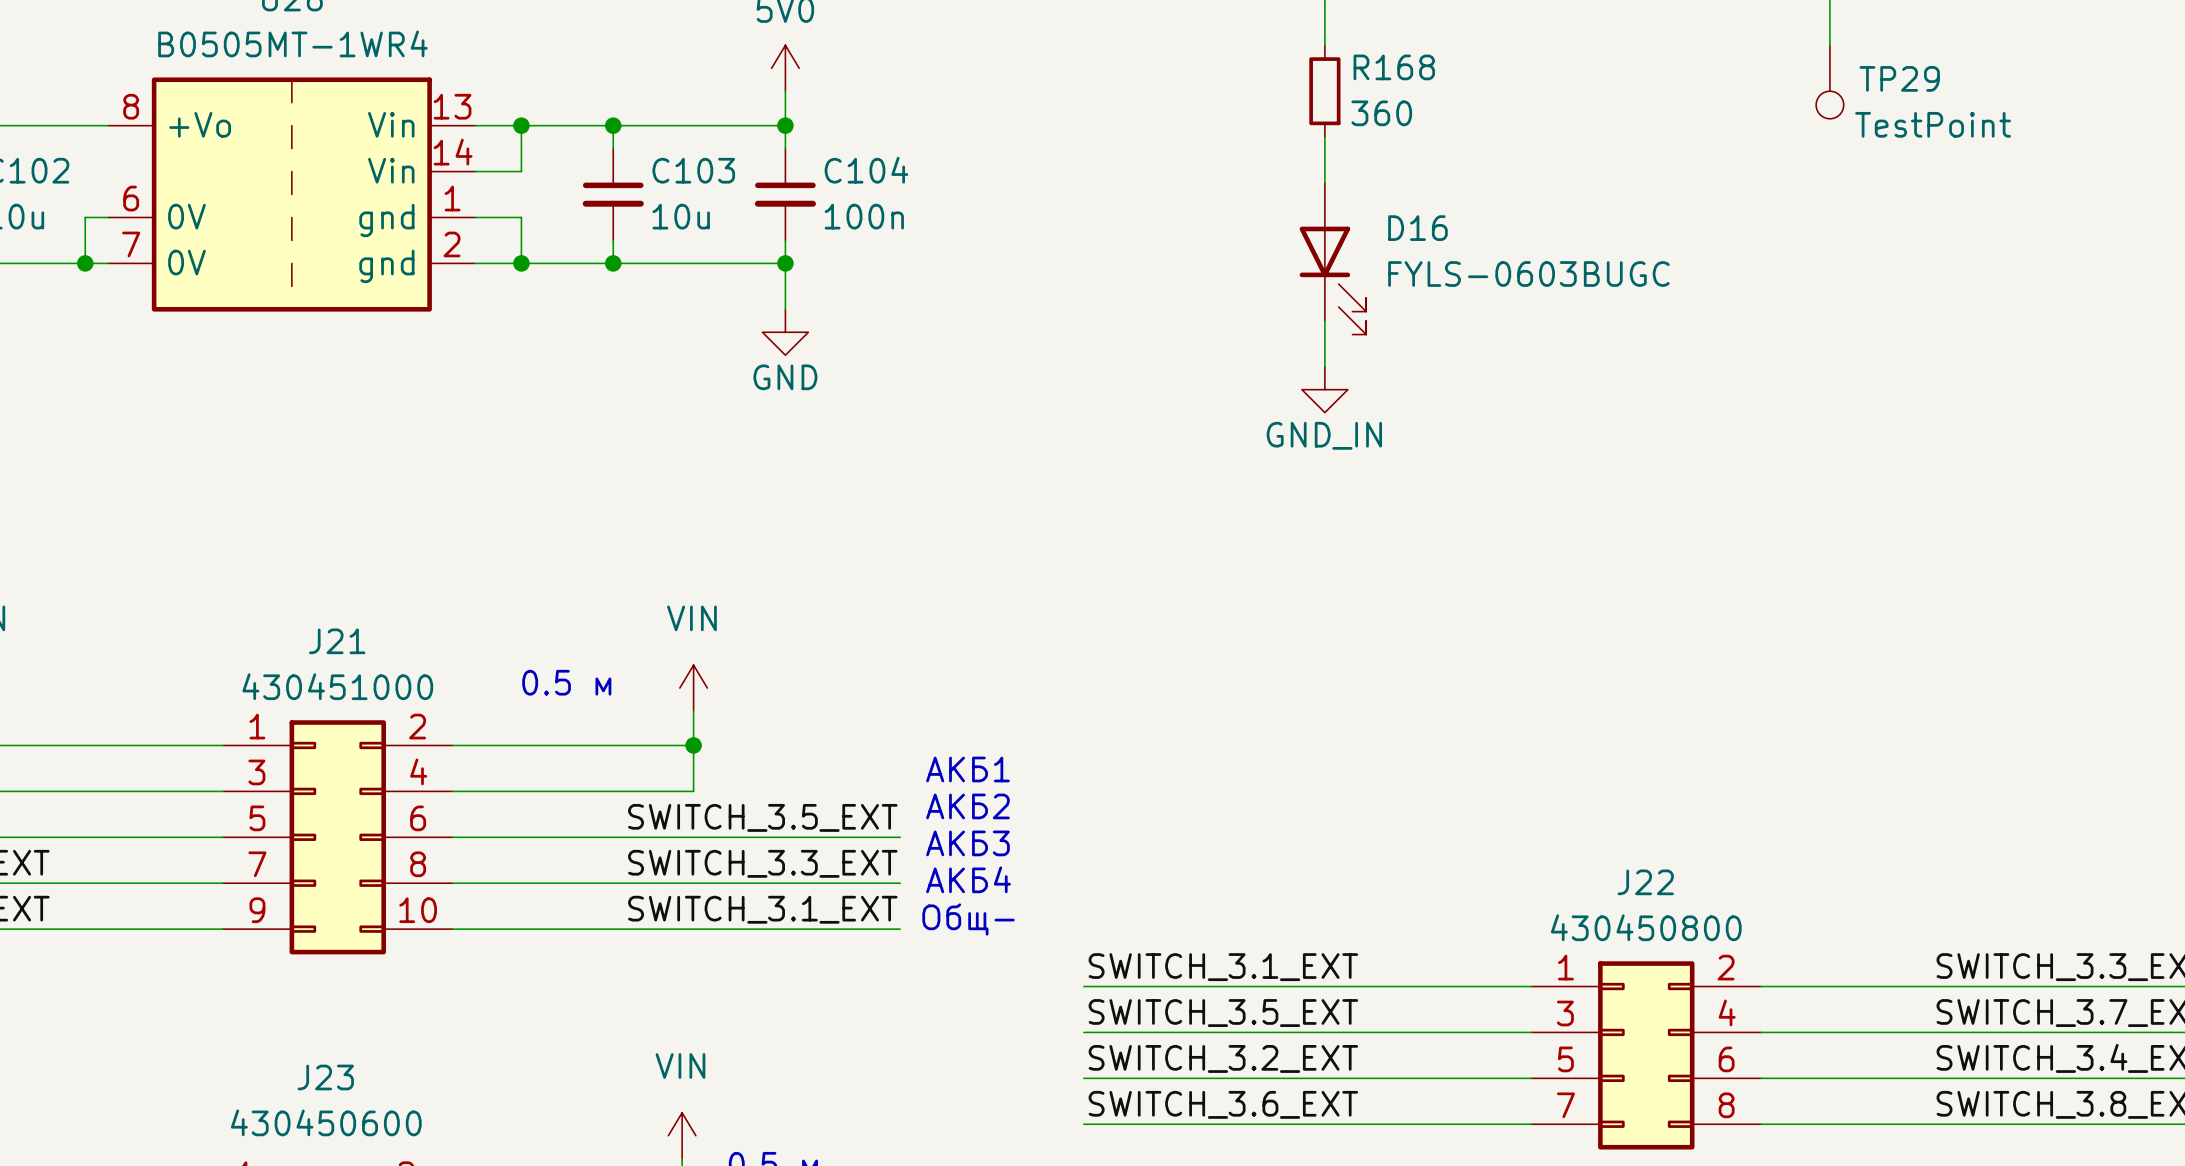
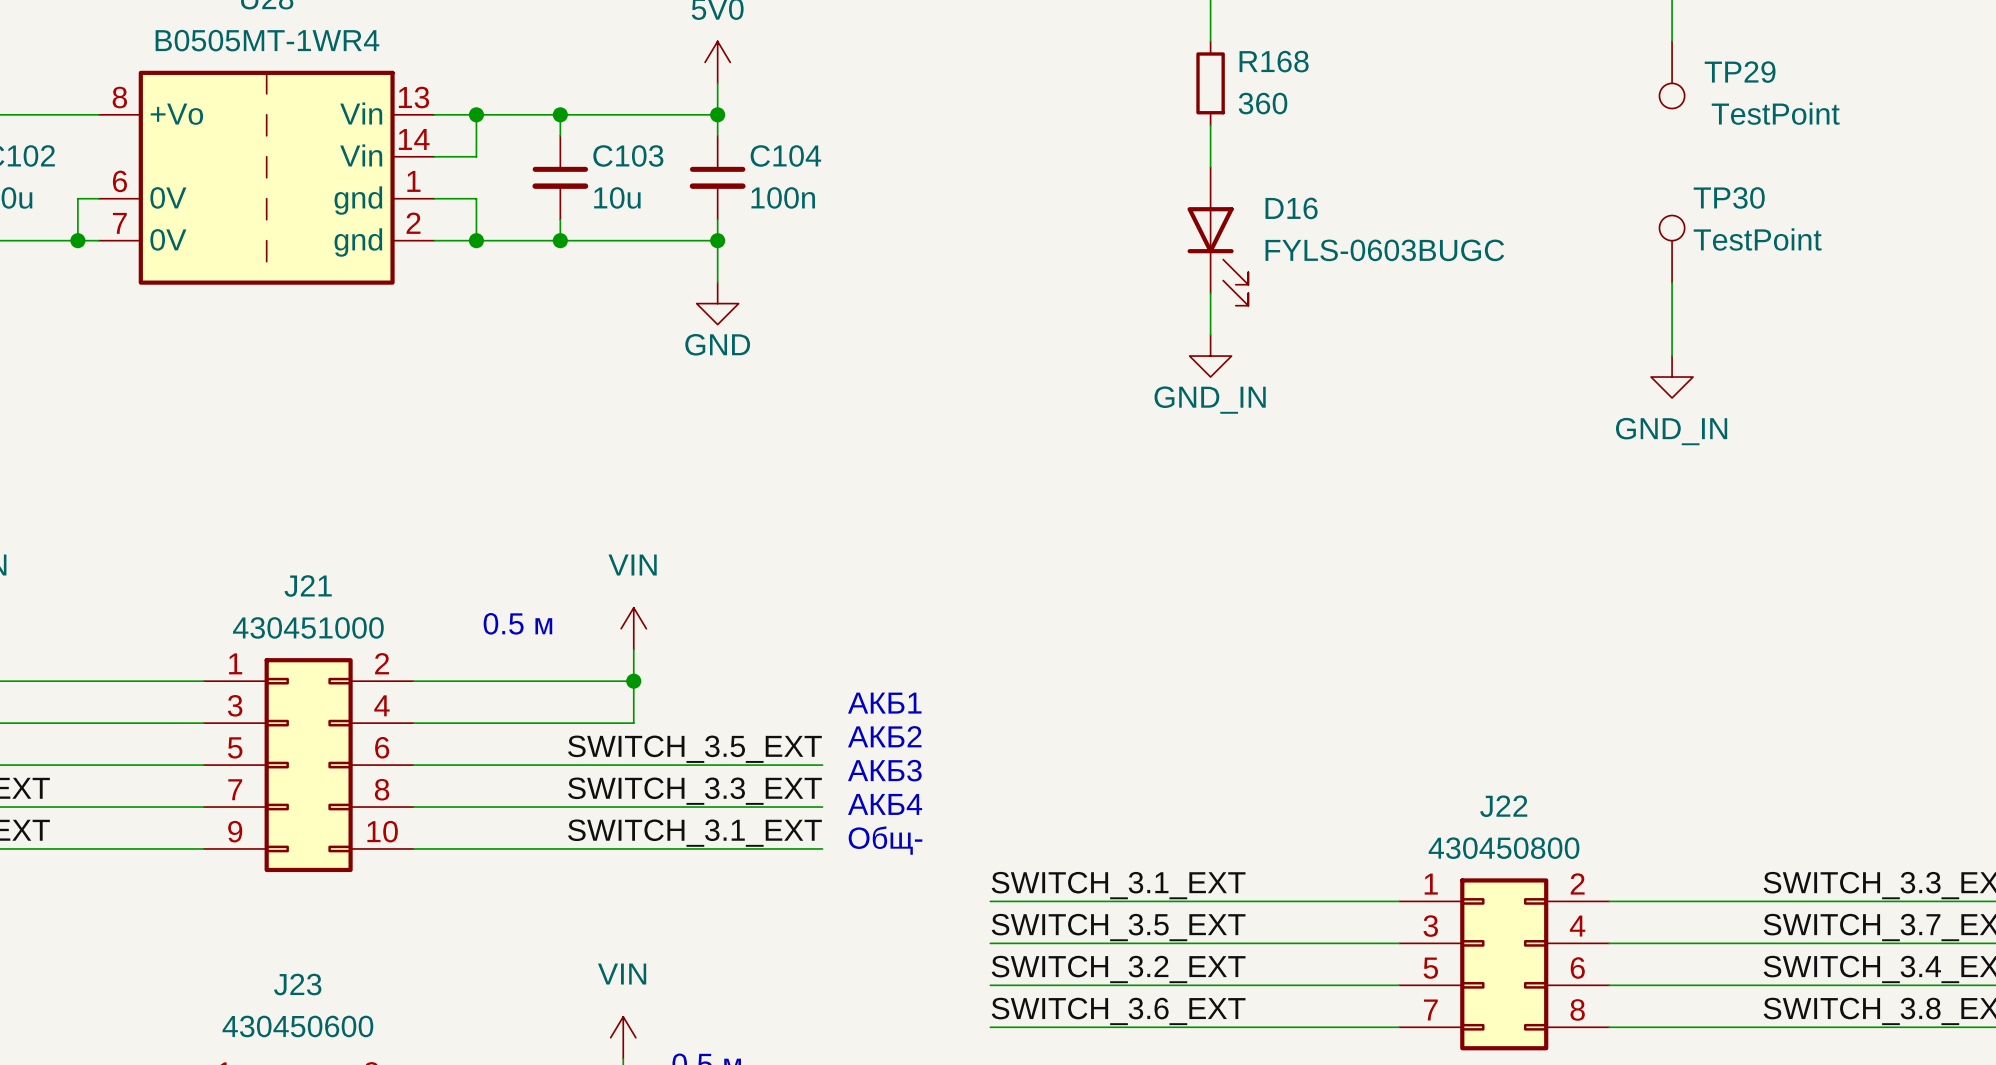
TP30: none -> TestPoint (1672, 249)
wire: none -> (1672, 282) (1672, 356)
power symbol: none -> GND_IN (1672, 377)

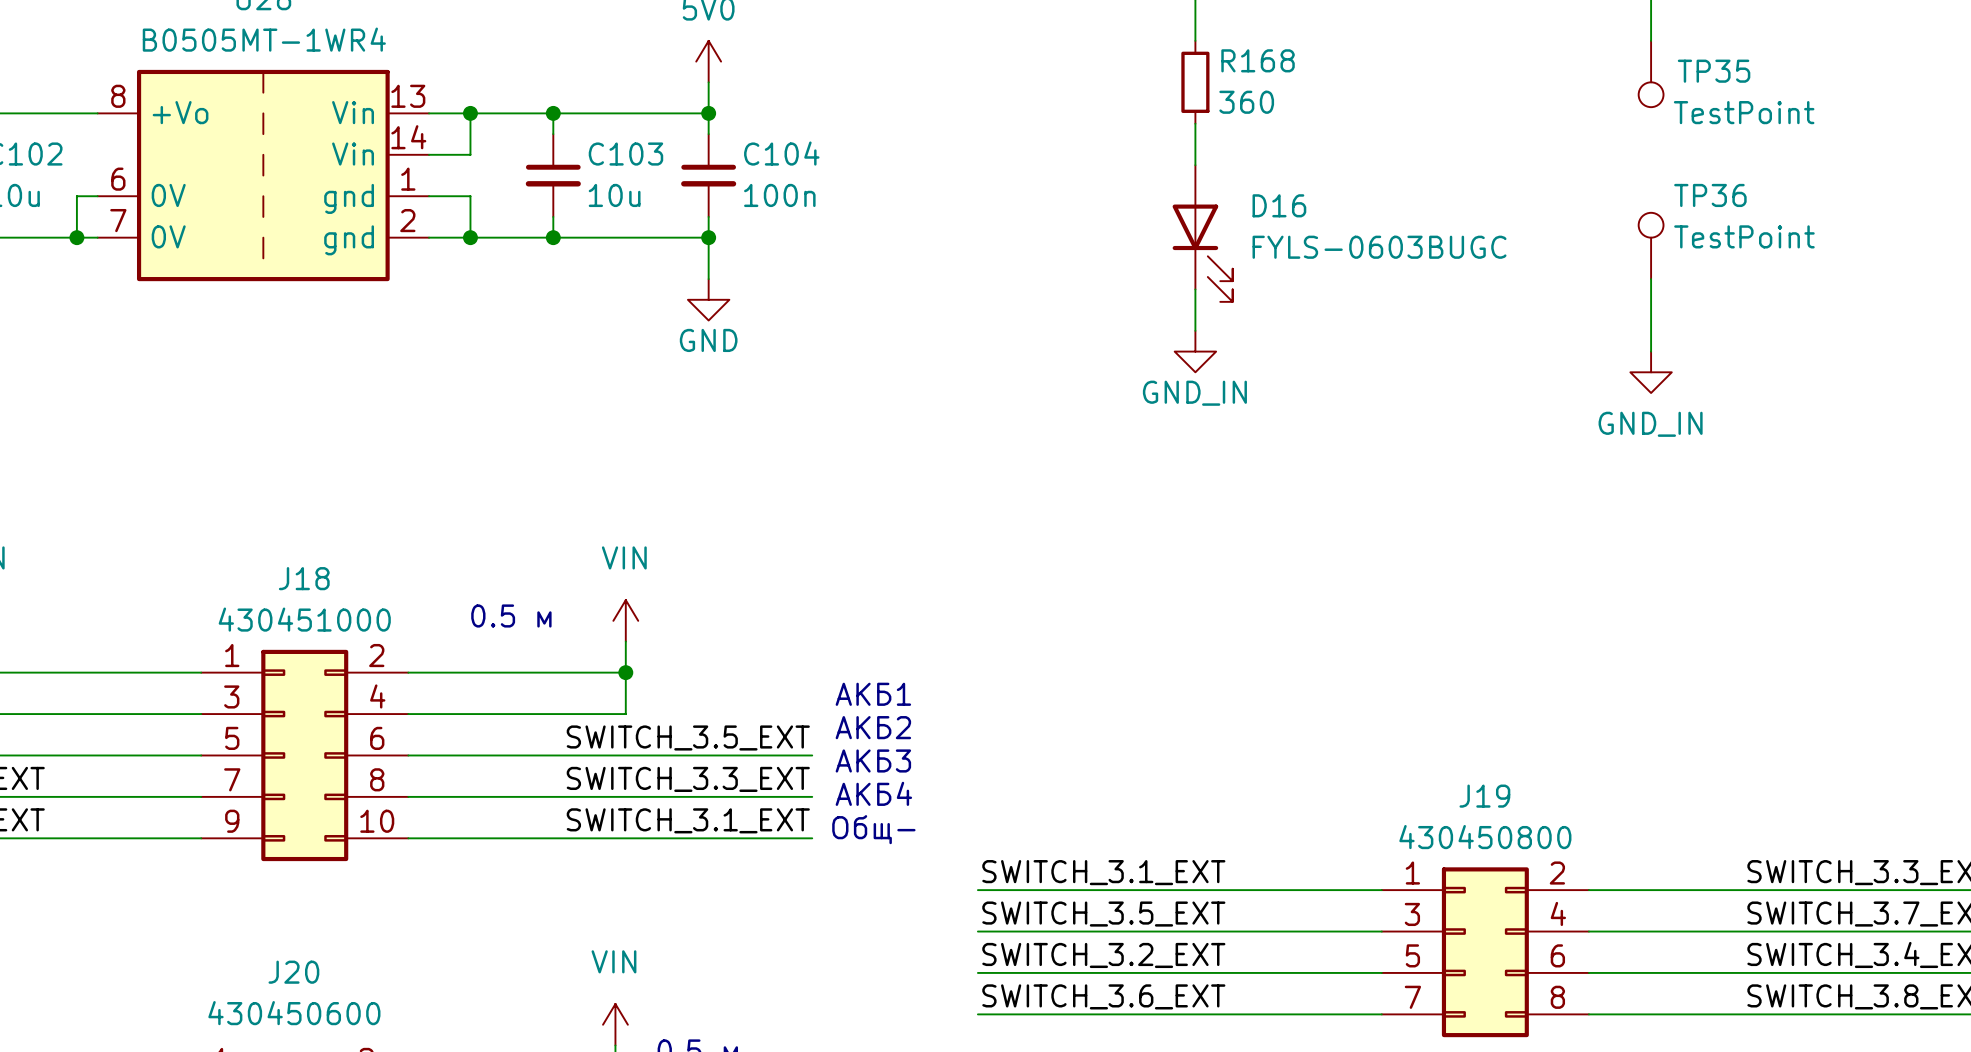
TP29 name: TP29 (1740, 72) -> TP35 (1714, 71)
TP30 name: TP30 (1729, 197) -> TP36 (1710, 195)
J21 name: J21 (308, 585) -> J18 (304, 578)
J22 name: J22 (1503, 806) -> J19 (1484, 796)
J23 name: J23 (297, 984) -> J20 (293, 972)

